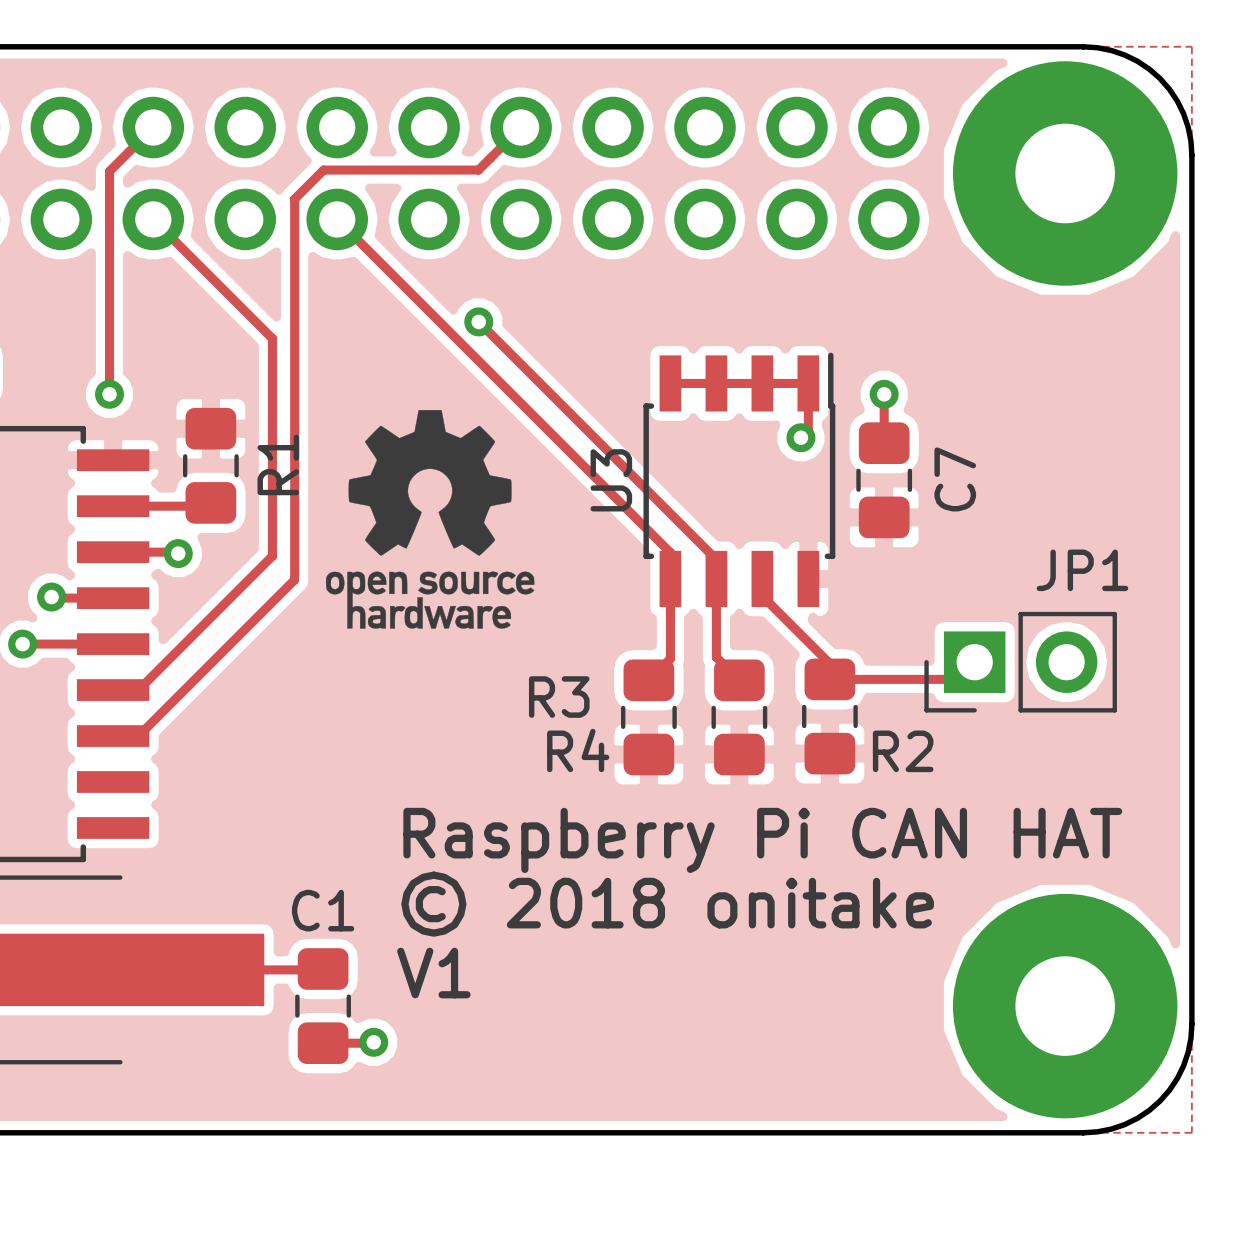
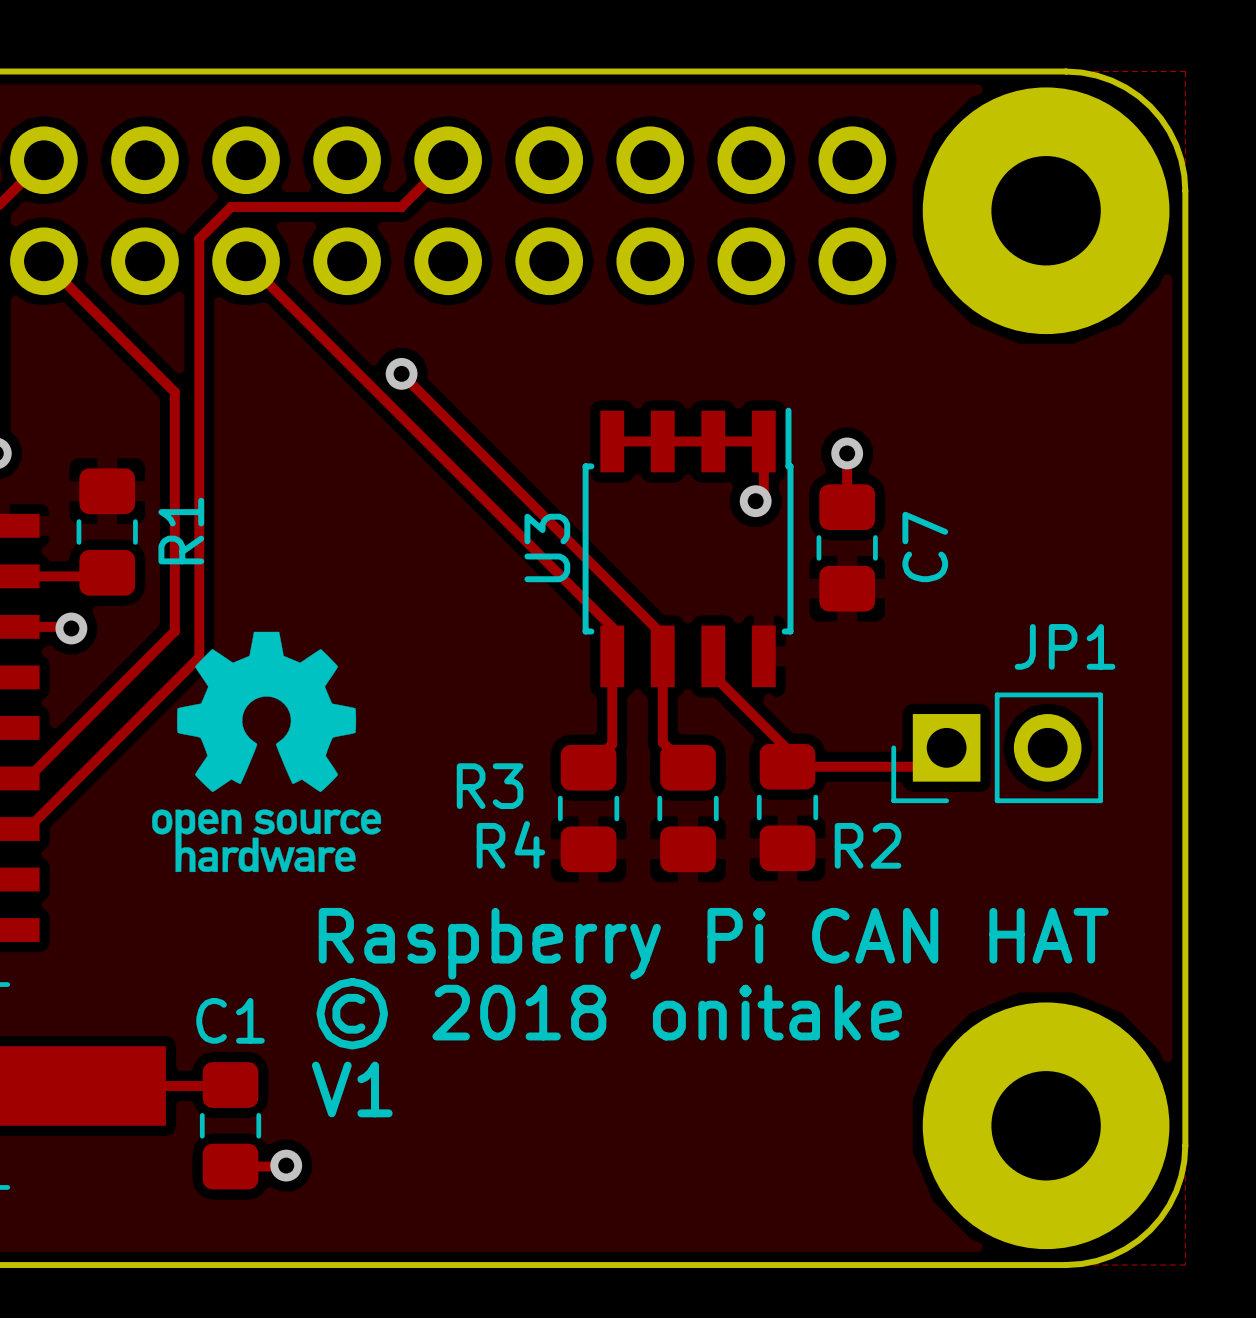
drawing position: (430, 519) -> (266, 751)

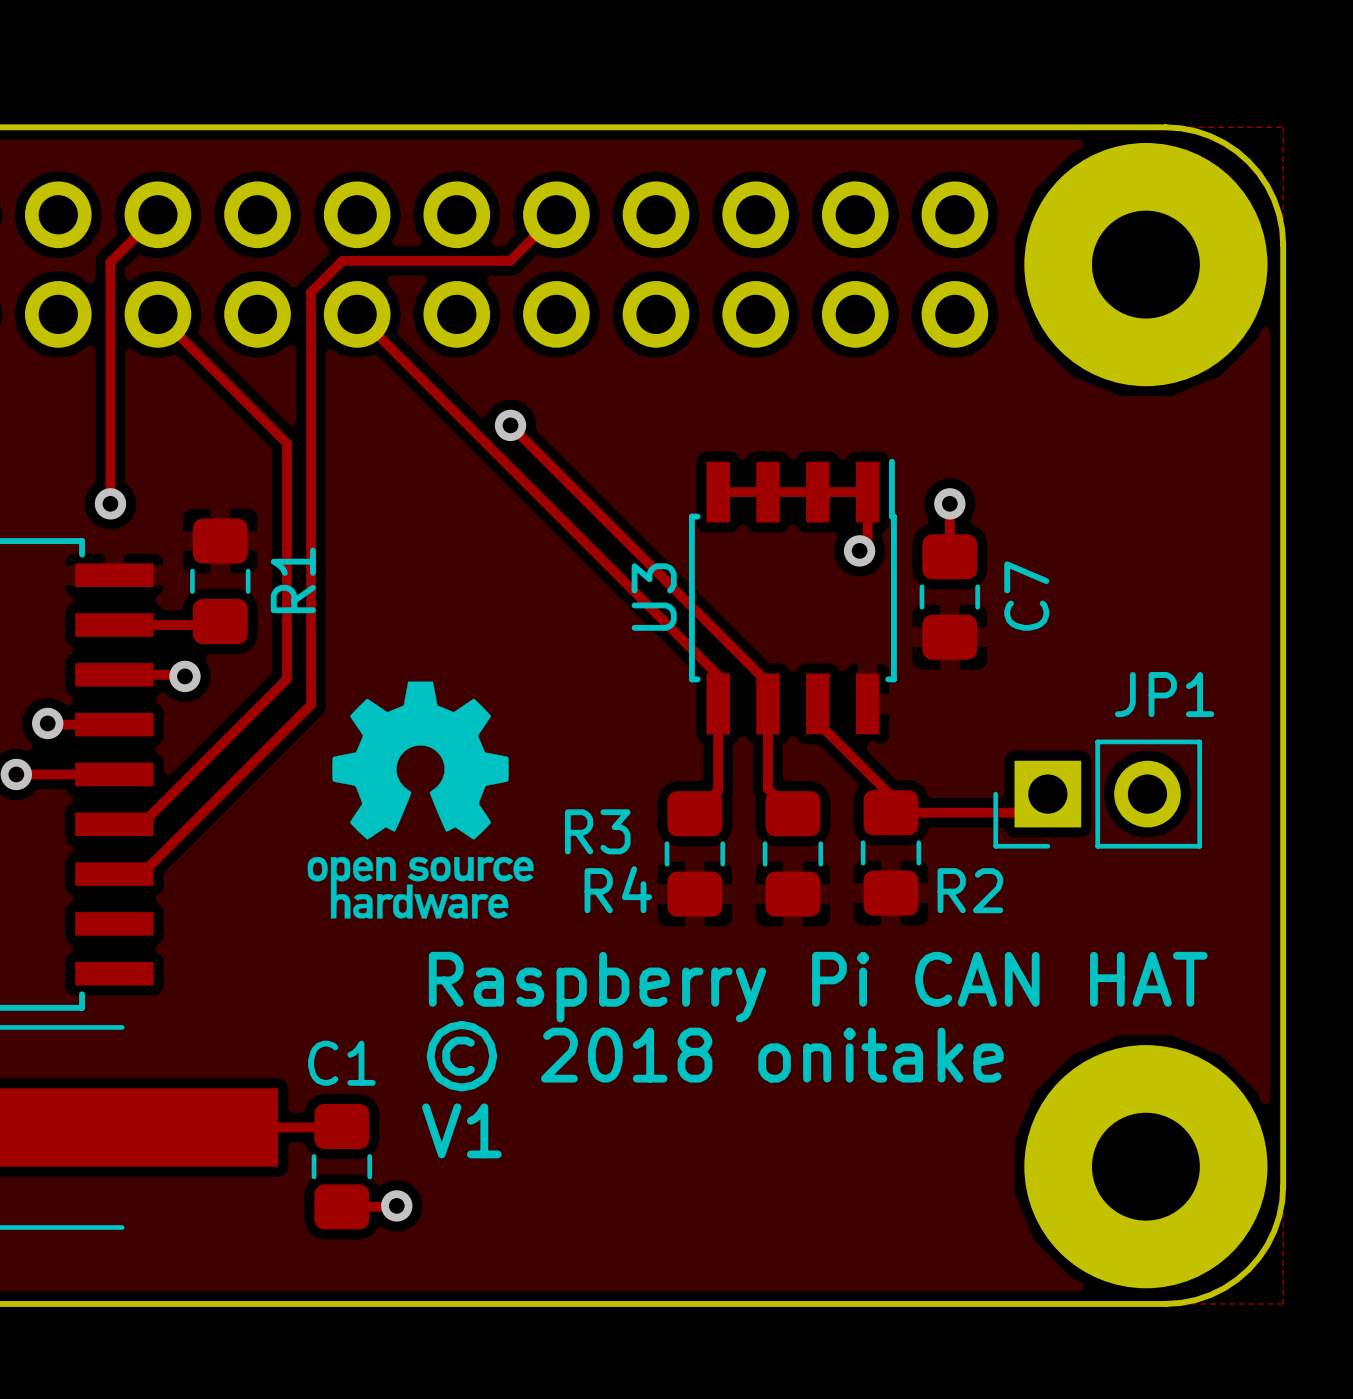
drawing position: (266, 751) -> (420, 800)

